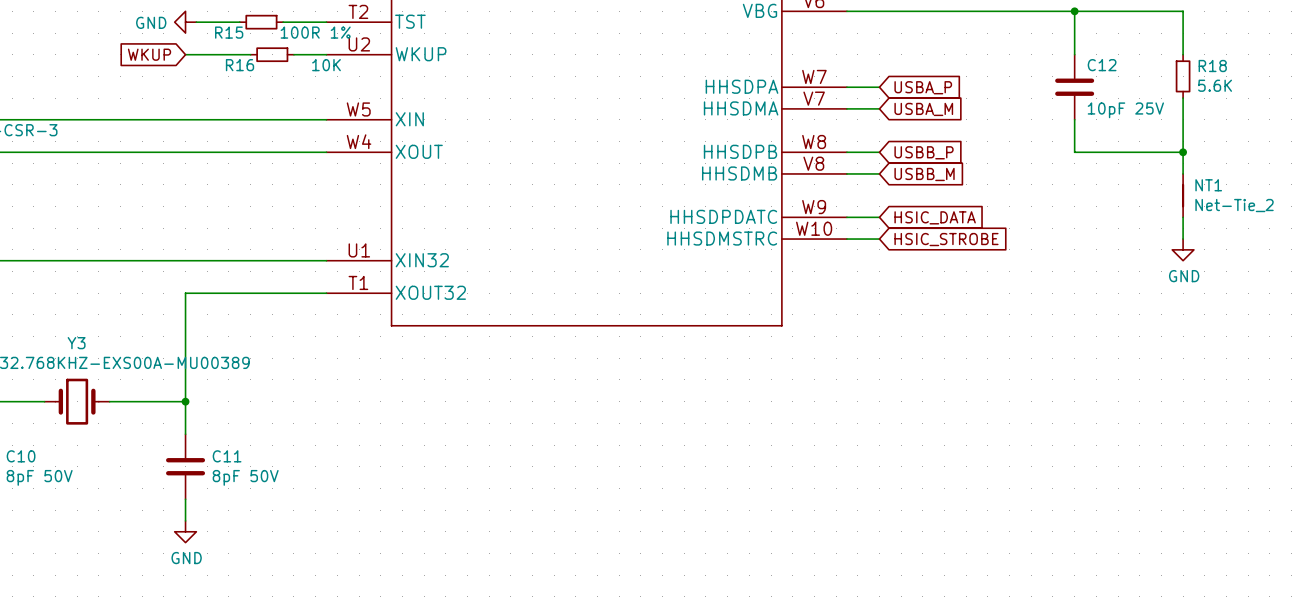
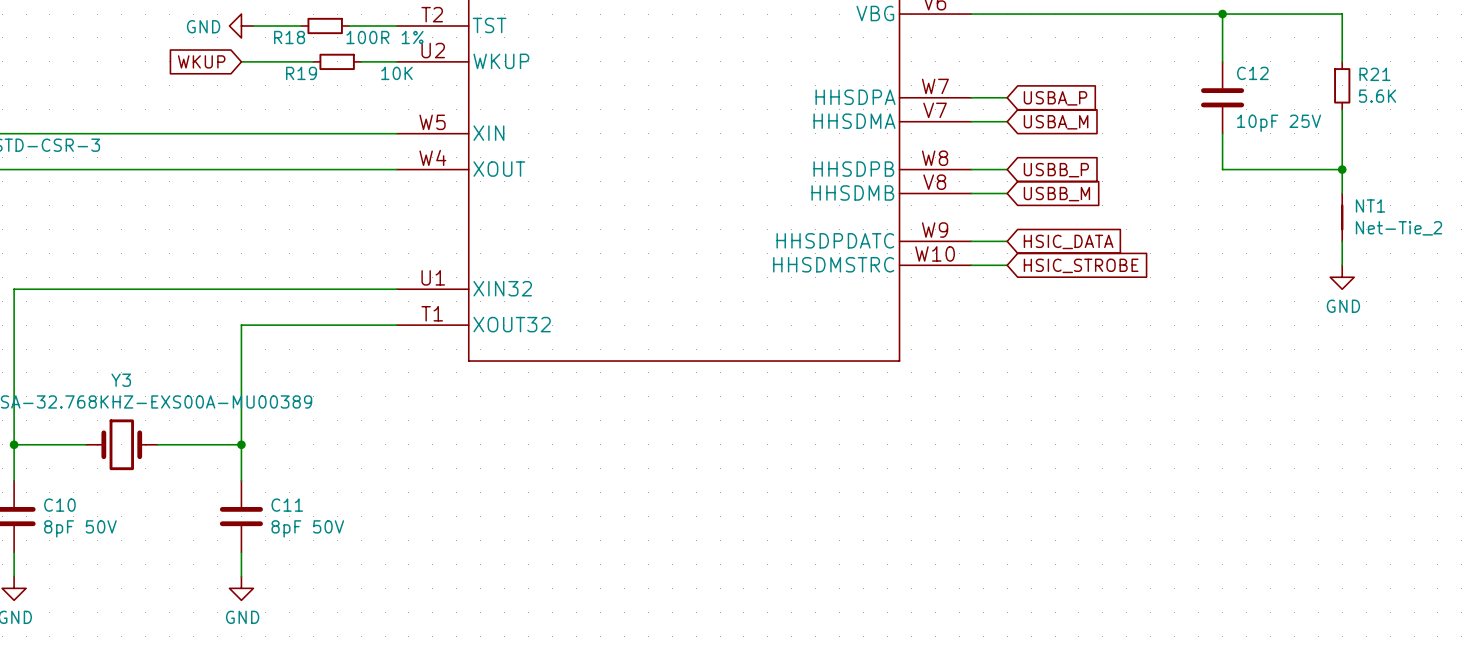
R15 name: R15 (229, 32) -> R18 (289, 37)
R16 name: R16 (240, 65) -> R19 (301, 73)
R18 name: R18 (1212, 66) -> R21 (1374, 74)

